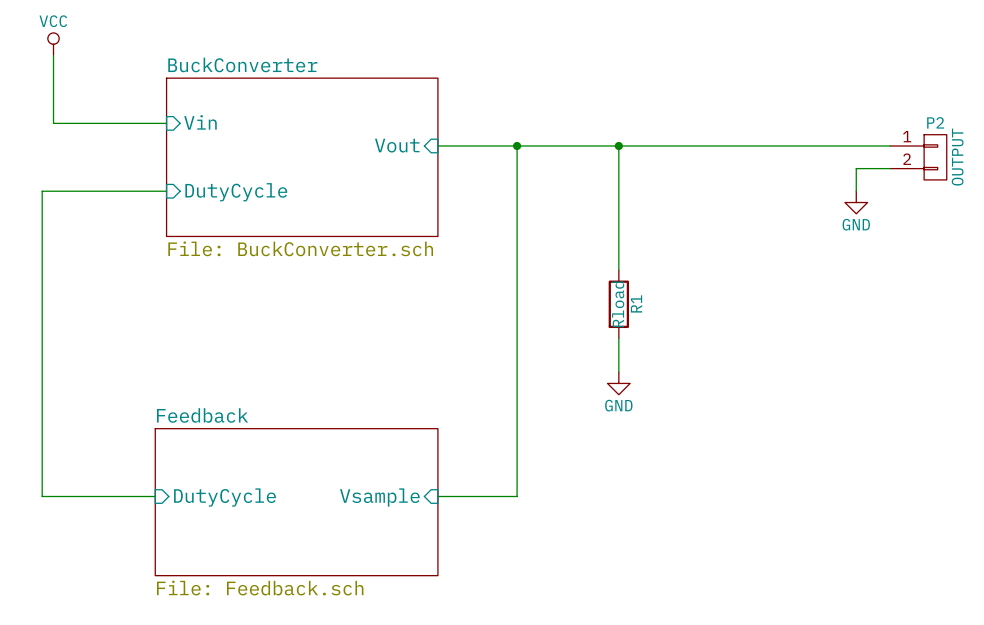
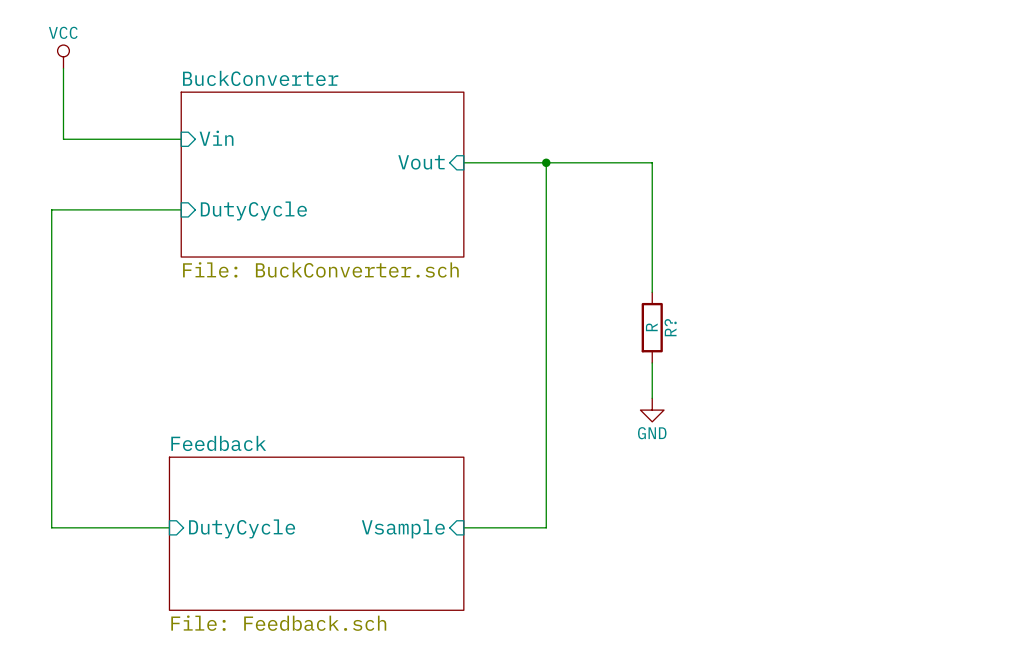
wire: (618, 146) (890, 146) -> none
junction: (618, 146) -> none
P2: OUTPUT (918, 157) -> none
wire: (890, 168) (856, 168) (856, 191) -> none
power symbol: GND (856, 202) -> none
R1 name: R1 (636, 303) -> R? (670, 327)
R1 value: Rload (618, 304) -> R (651, 327)

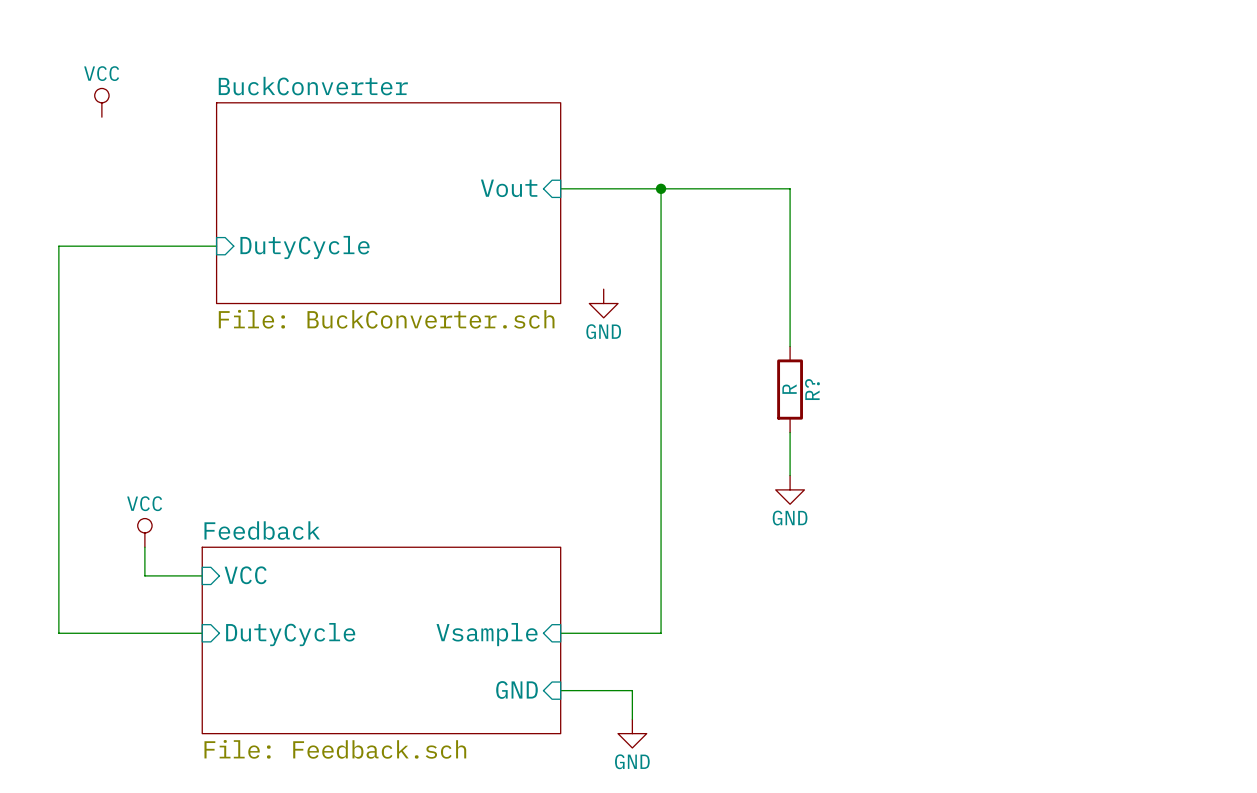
power symbol position: VCC (63, 56) -> VCC (101, 102)
wire: (63, 68) (63, 139) (181, 139) -> none
sheet pin: Vin (216, 138) -> none
power symbol: none -> GND (603, 303)
power symbol: none -> VCC (144, 532)
wire: none -> (144, 547) (144, 575) (202, 575)
sheet pin: none -> VCC (245, 575)
sheet pin: none -> GND (516, 689)
wire: none -> (560, 690) (632, 690) (632, 719)
power symbol: none -> GND (632, 733)

